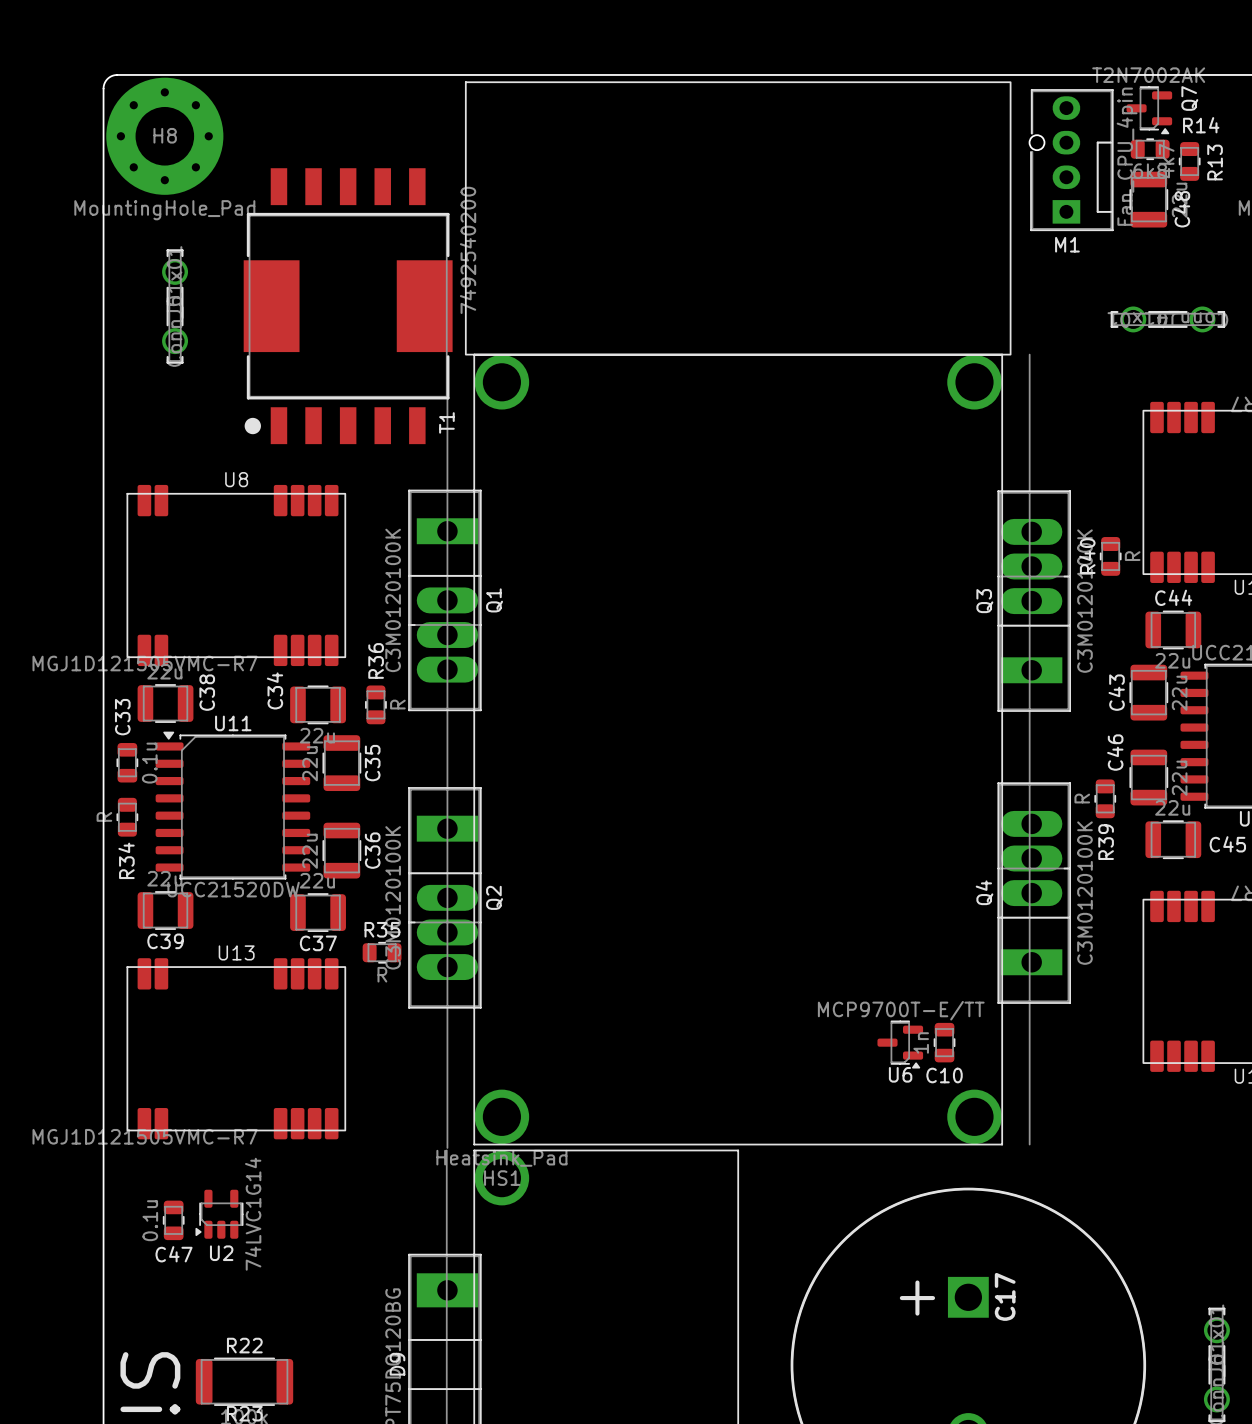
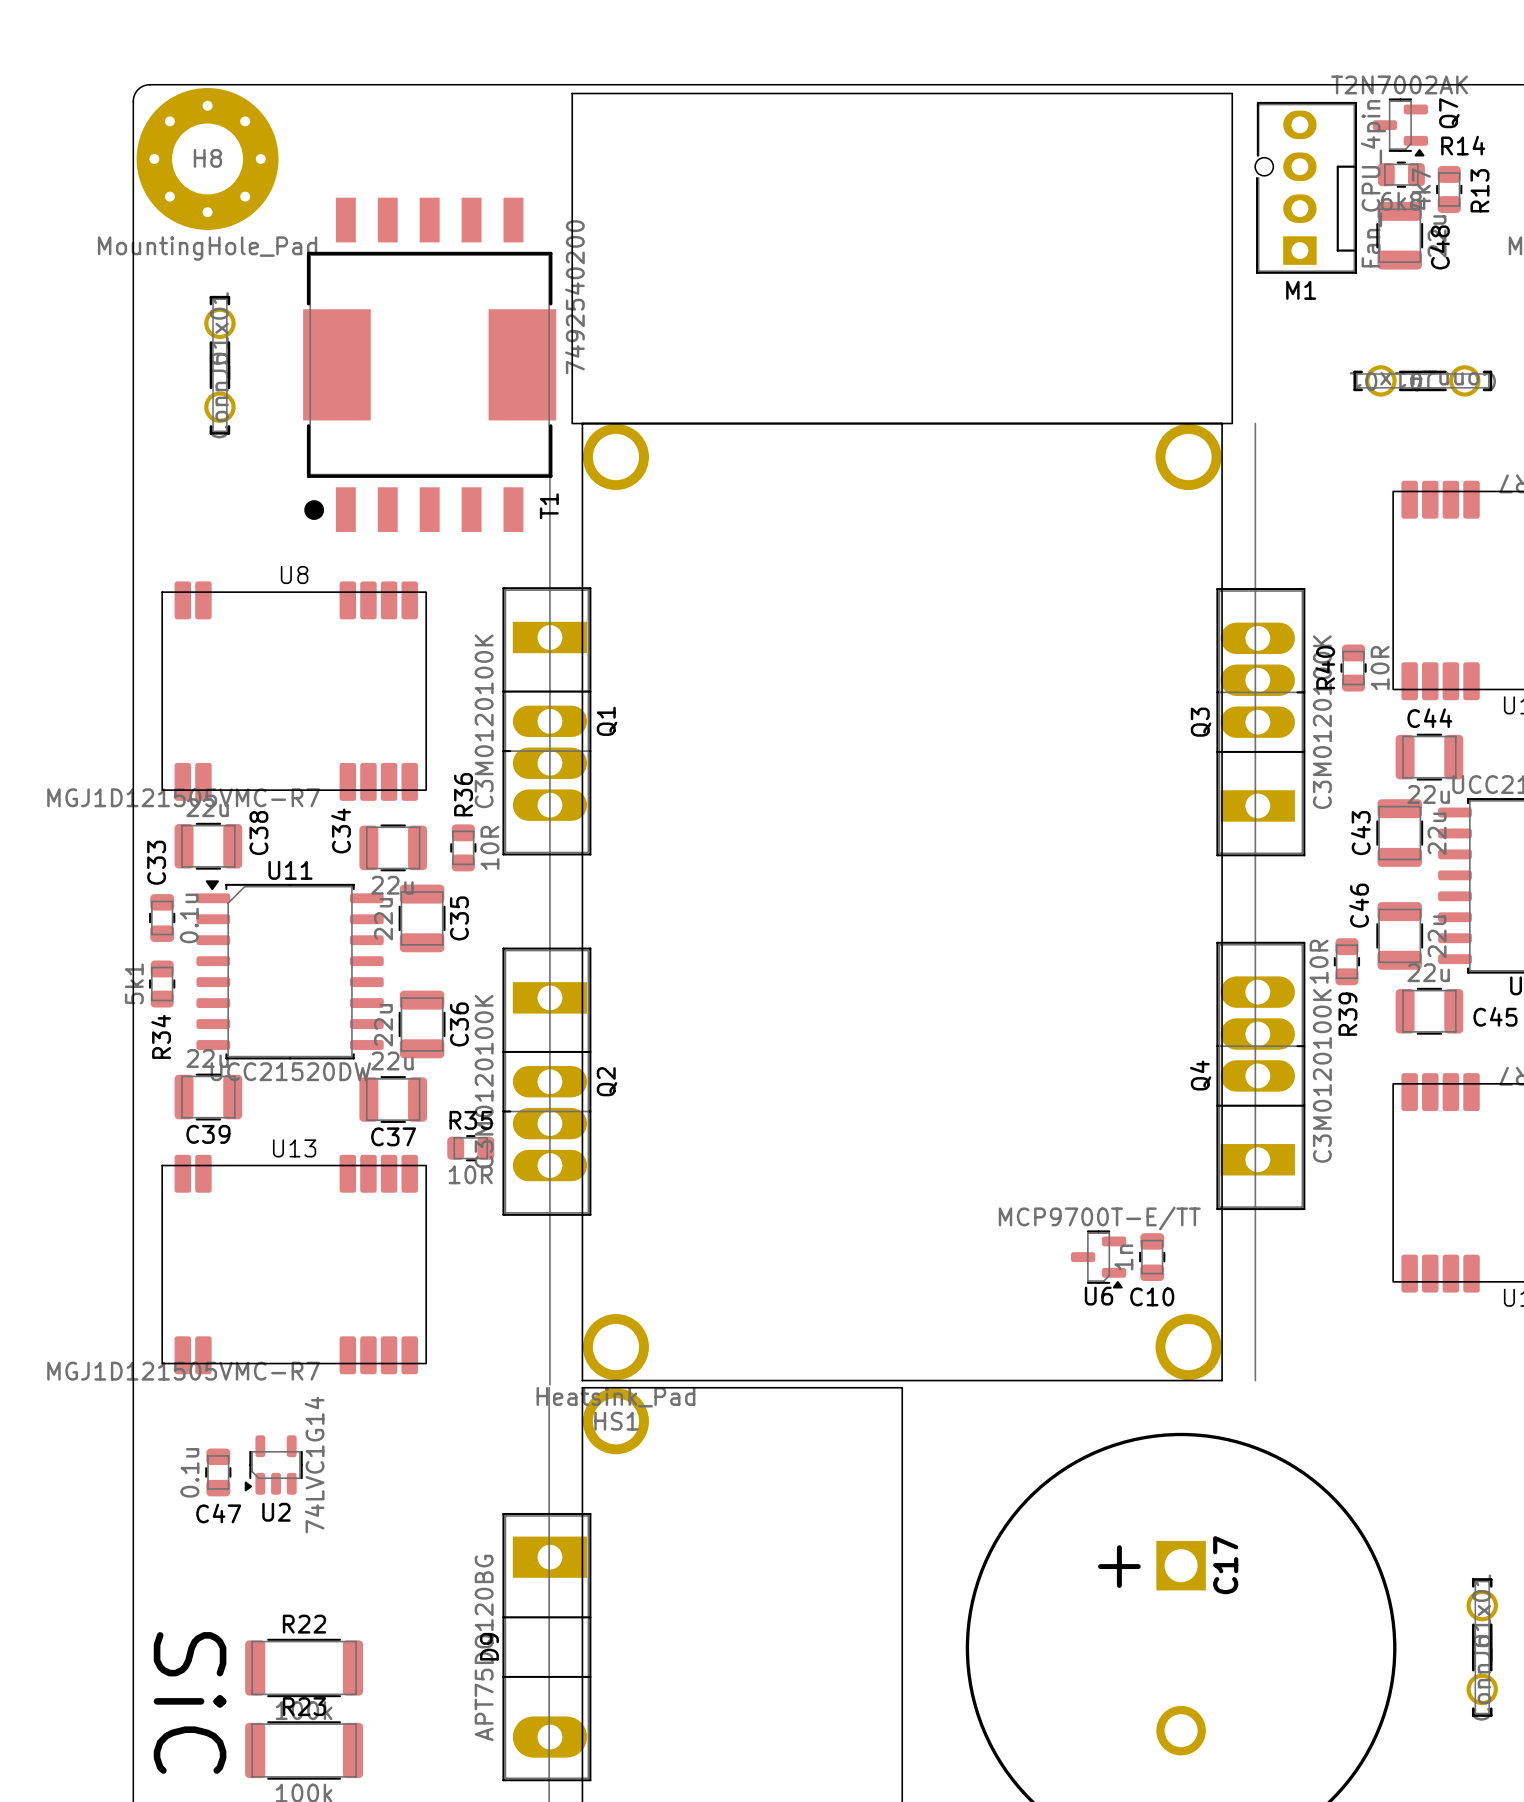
R40 value: R (1132, 556) -> 10R (1380, 668)
R36 value: R (397, 704) -> 10R (489, 847)
R39 value: R (1082, 798) -> 10R (1319, 961)
R34 value: R (104, 816) -> 5k1 (134, 984)
R35 value: R (382, 974) -> 10R (470, 1174)

